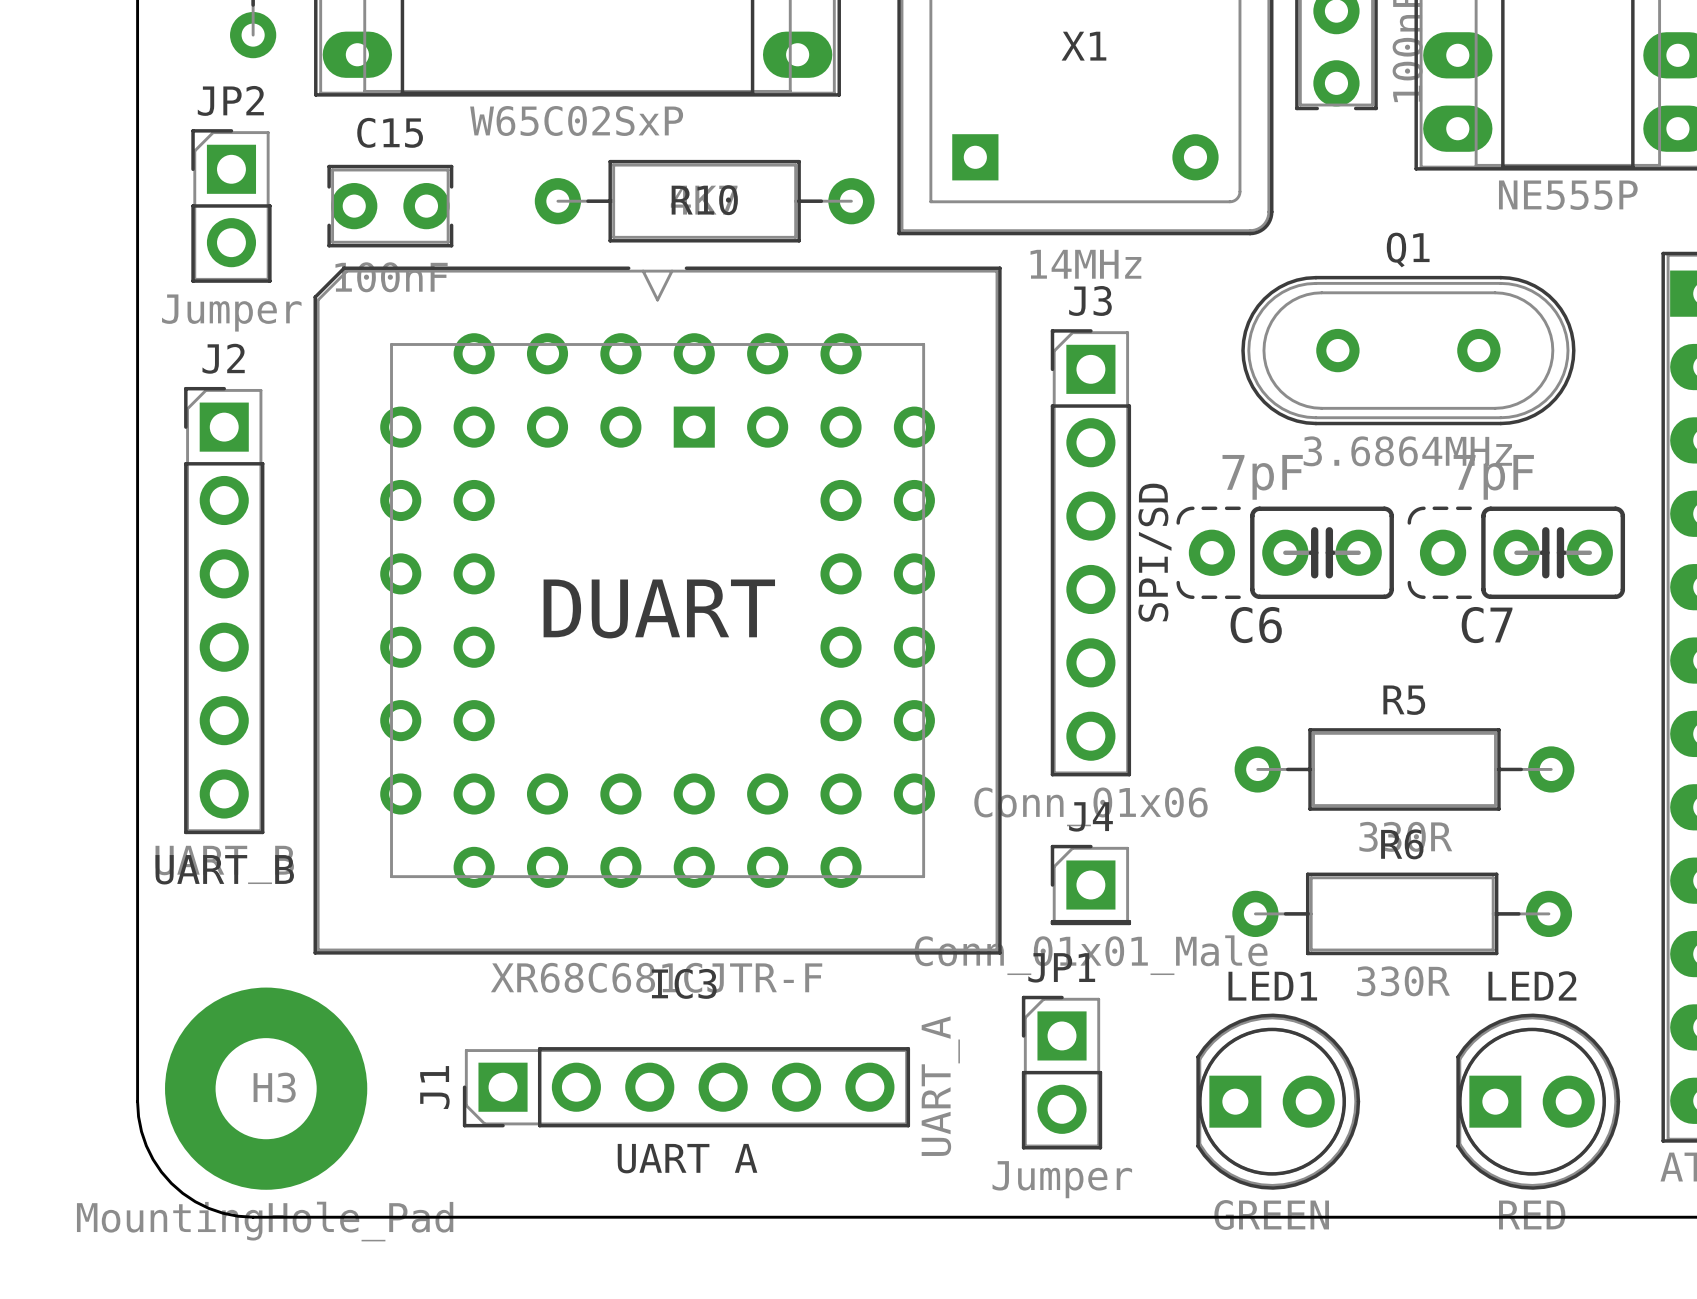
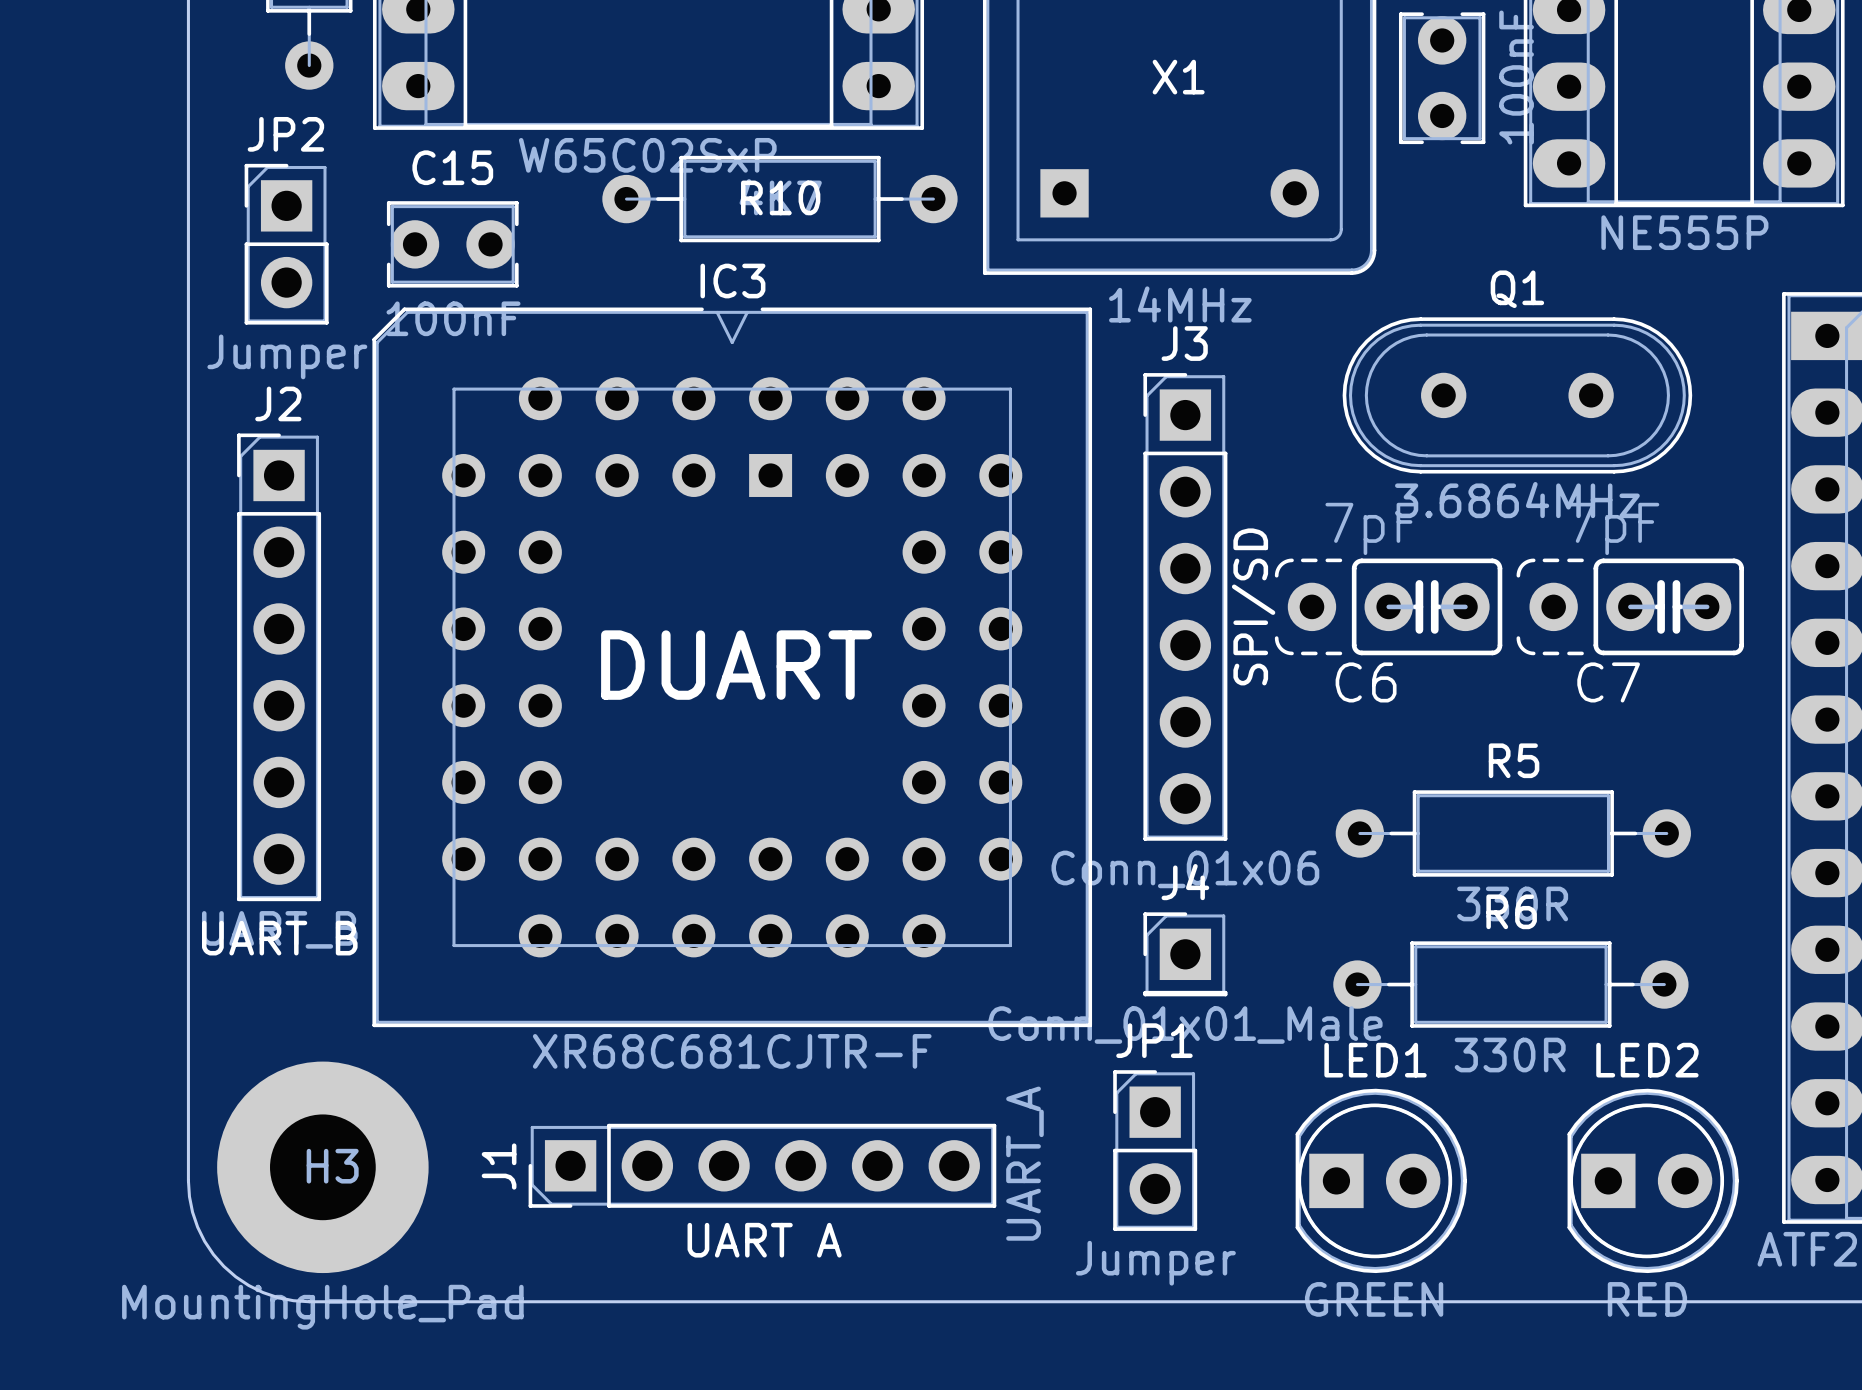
R10 position: (704, 201) -> (779, 199)
IC3 name position: IC3 (684, 983) -> IC3 (732, 281)

